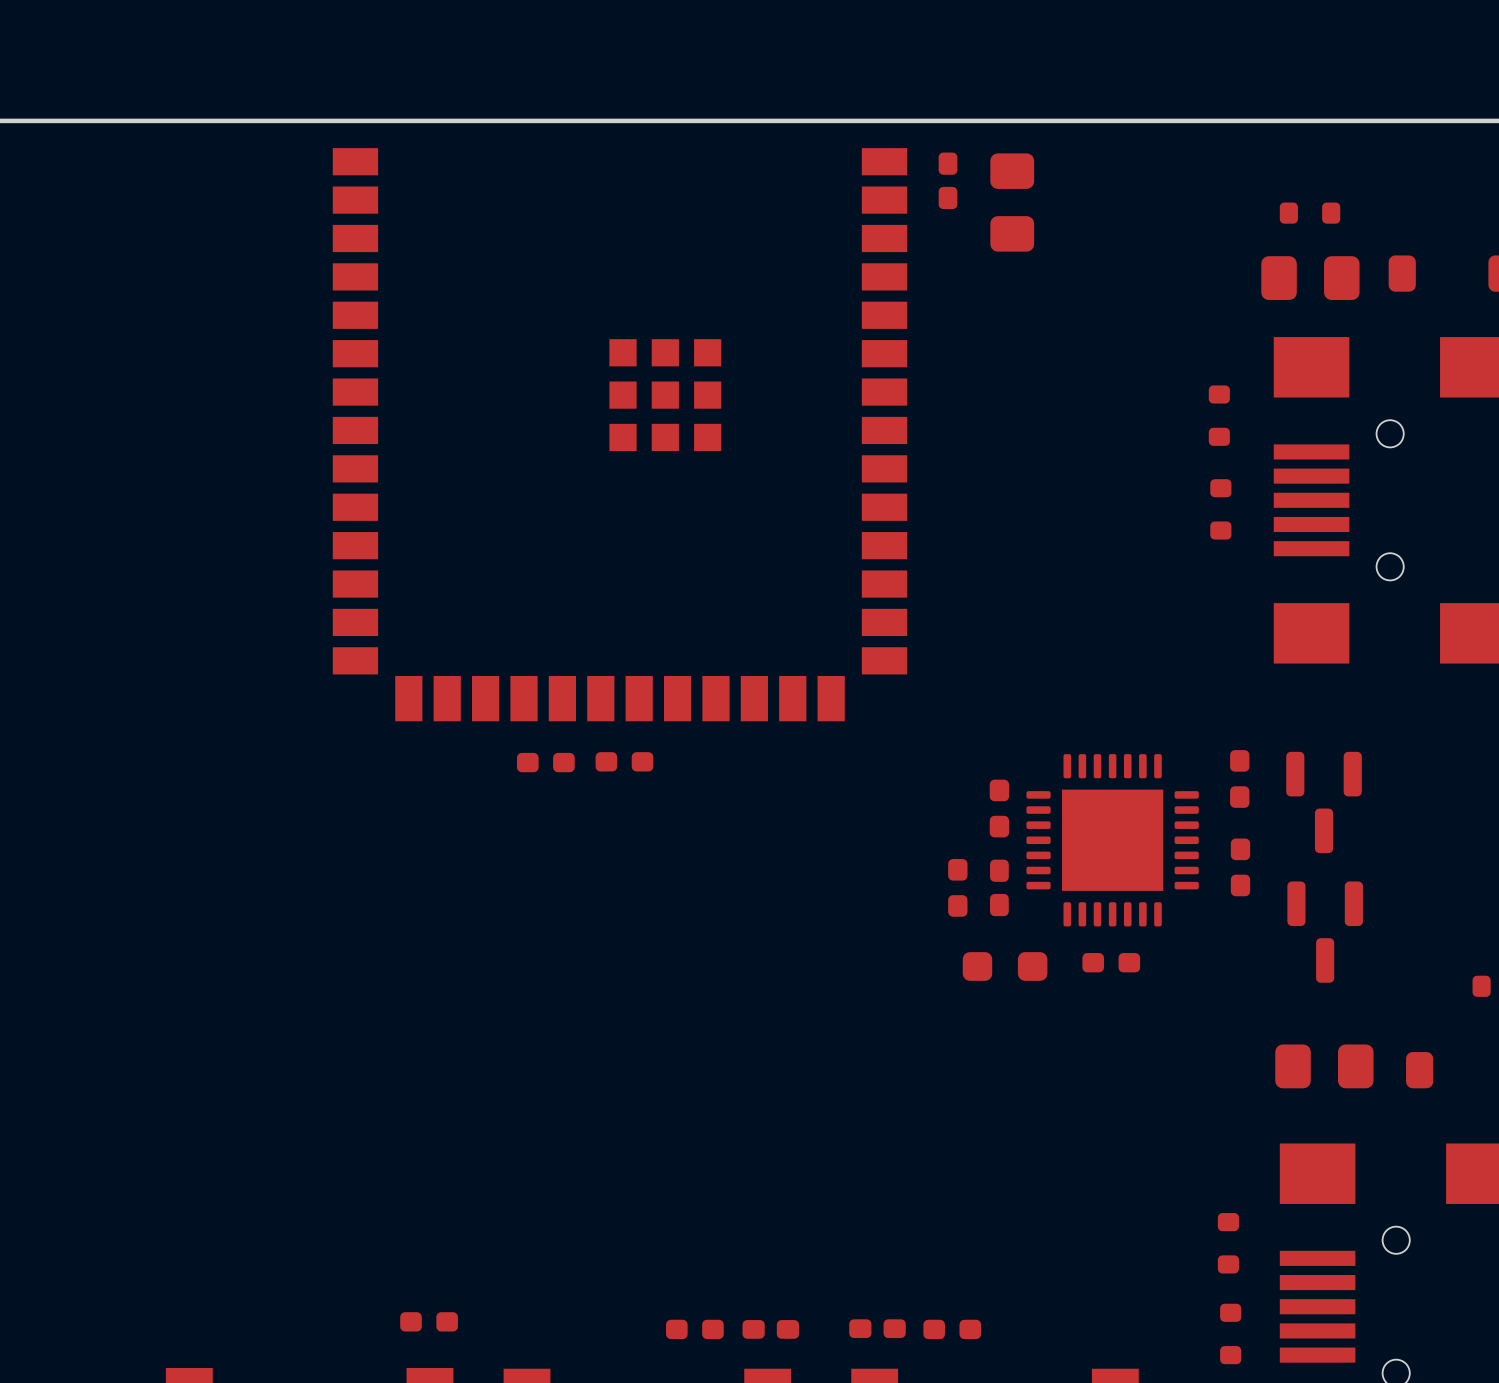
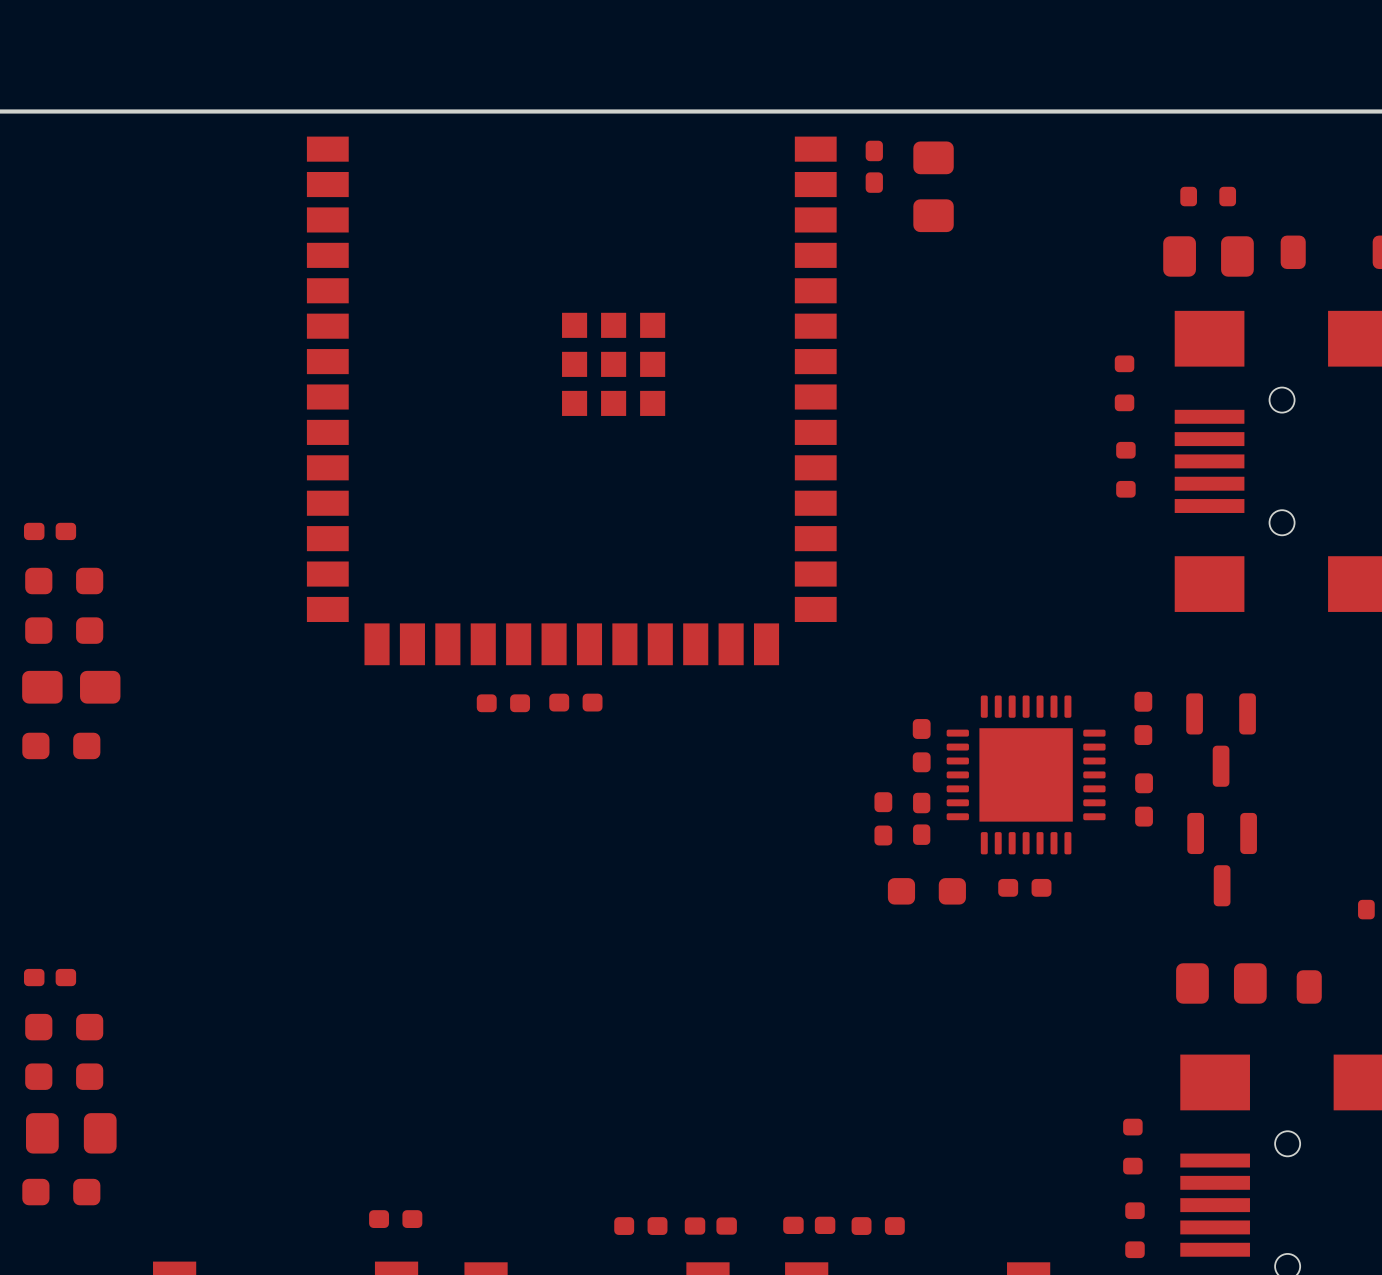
part: none -> (50, 531)
part: none -> (64, 581)
part: none -> (64, 630)
part: none -> (71, 687)
part: none -> (61, 745)
part: none -> (50, 977)
part: none -> (64, 1027)
part: none -> (64, 1076)
part: none -> (71, 1133)
part: none -> (61, 1192)

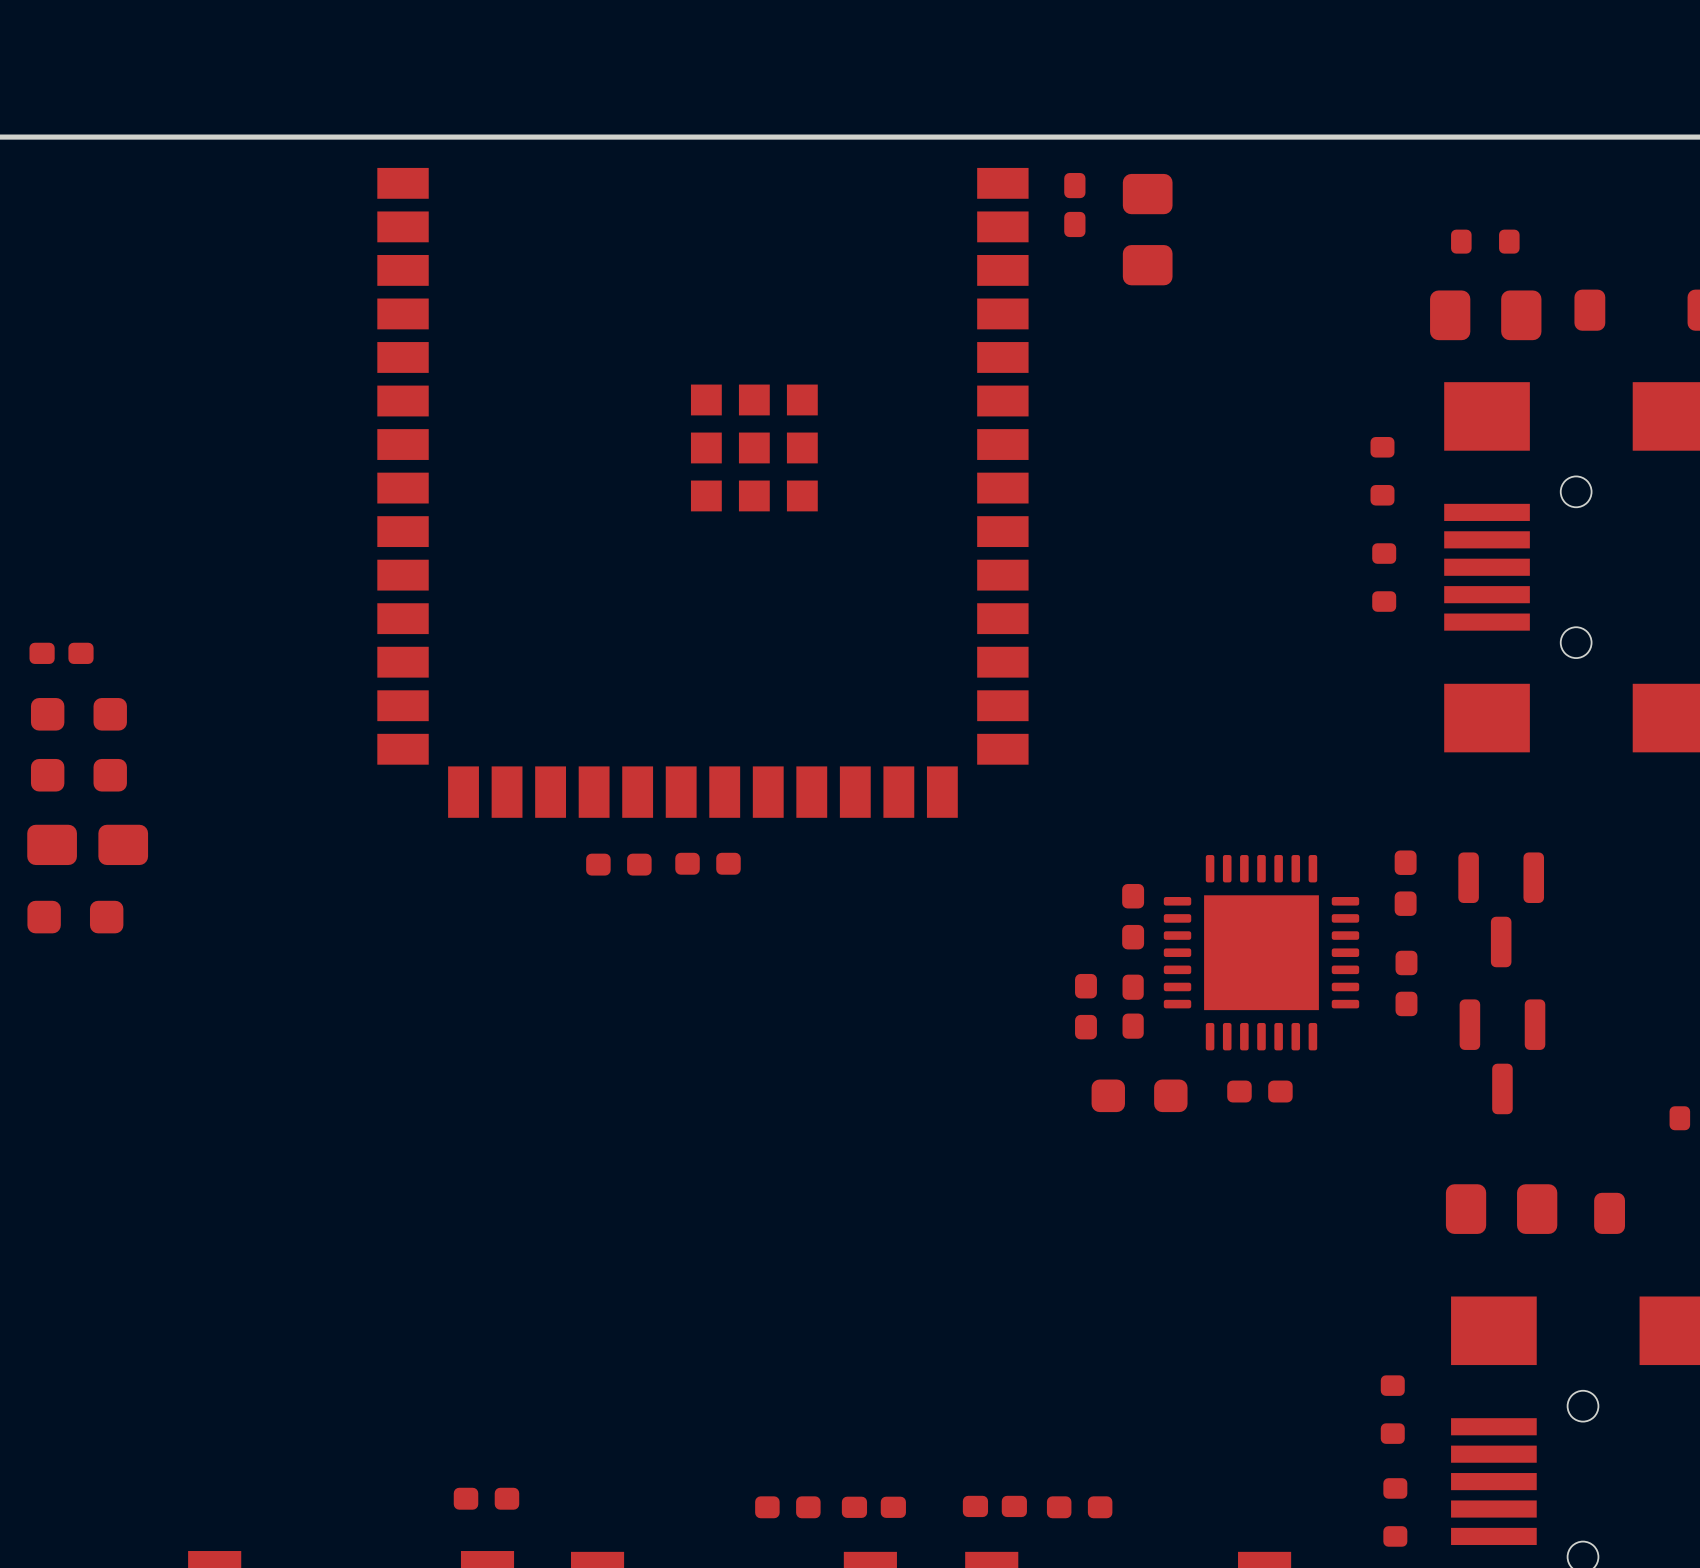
part: (50, 977) -> none
part: (64, 1027) -> none
part: (64, 1076) -> none
part: (71, 1133) -> none
part: (61, 1192) -> none

